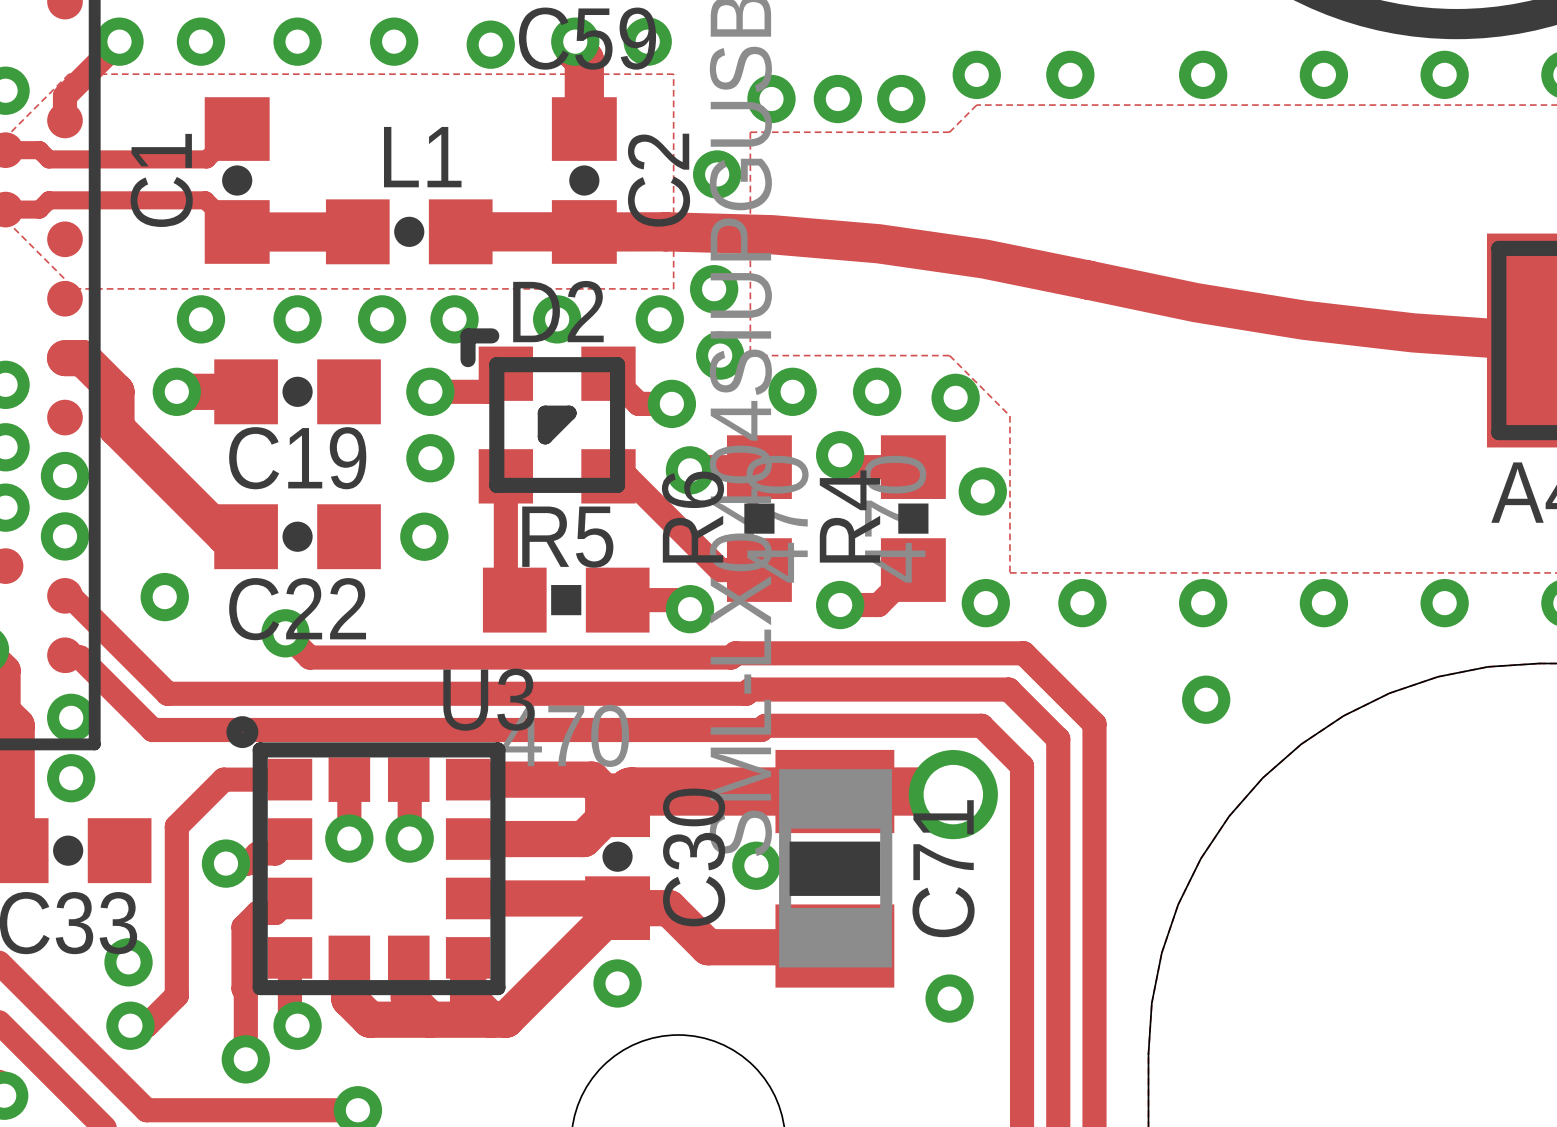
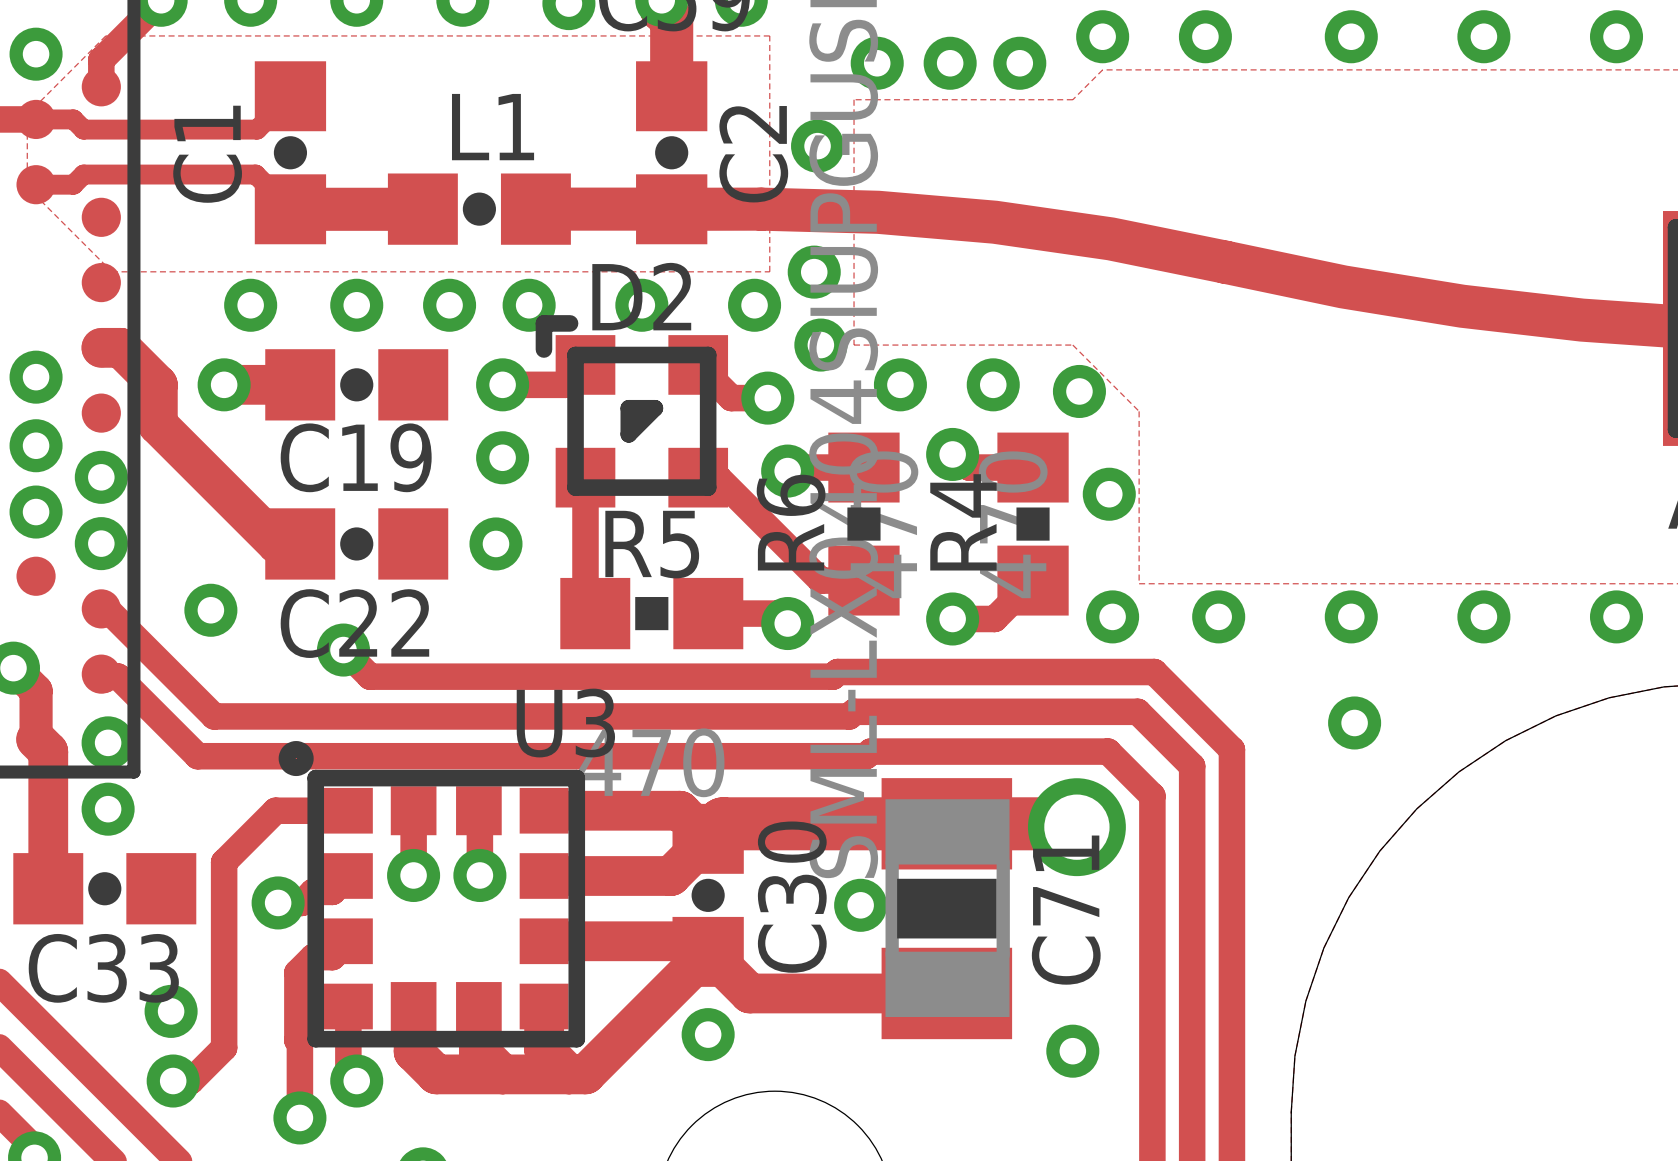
track: (617, 908) (669, 908) (708, 947) (833, 947) -> (708, 951) (749, 993) (946, 993)

